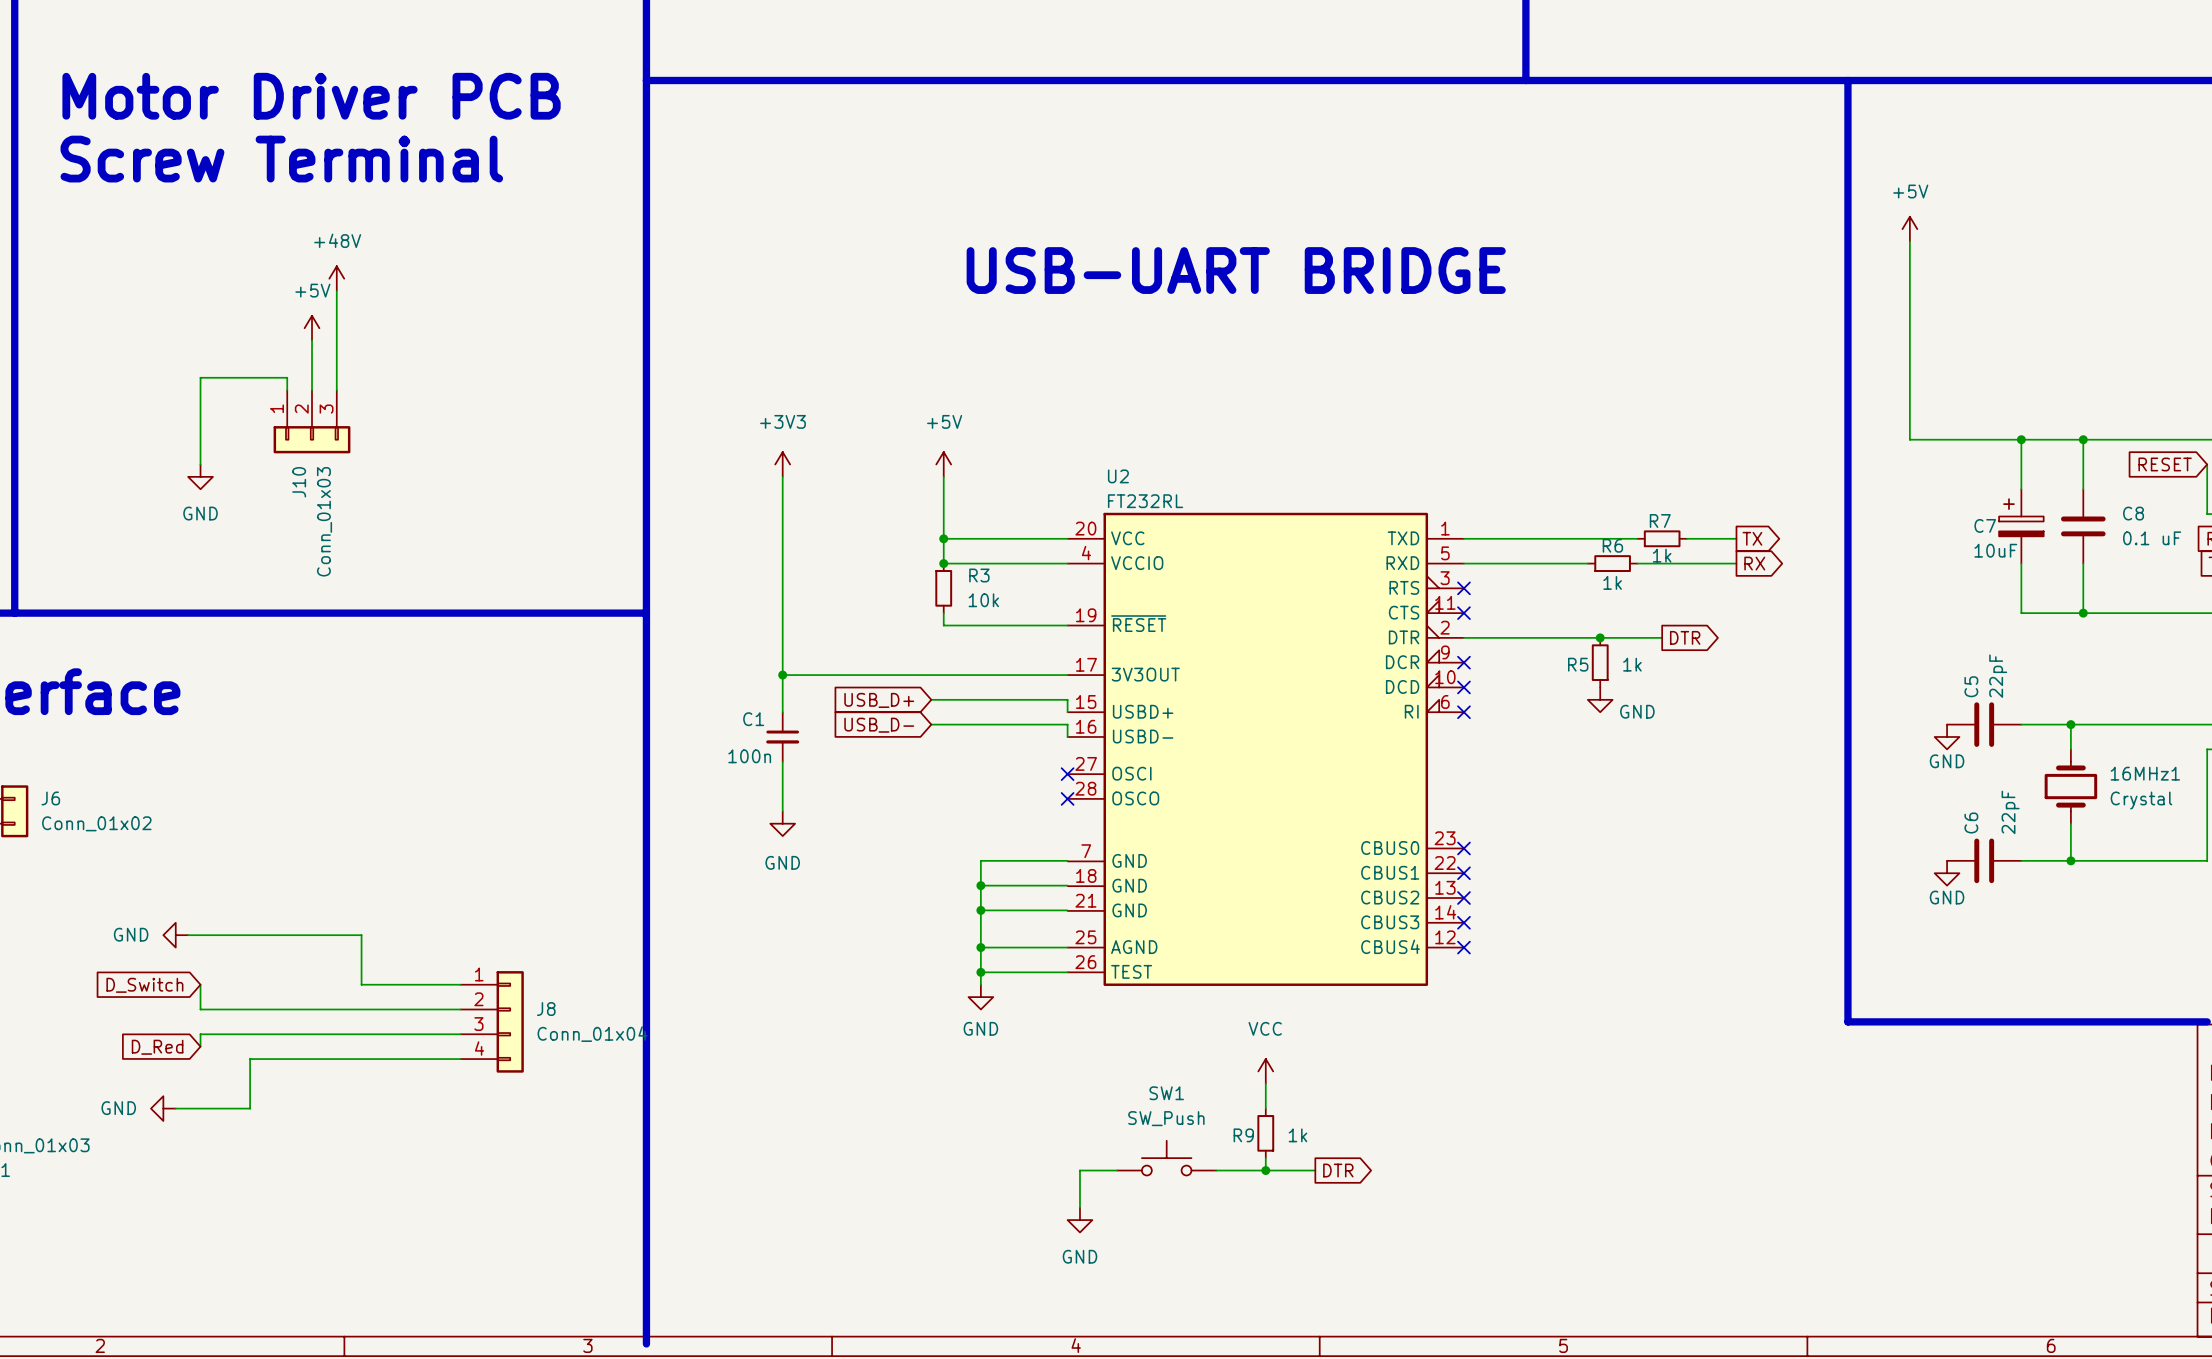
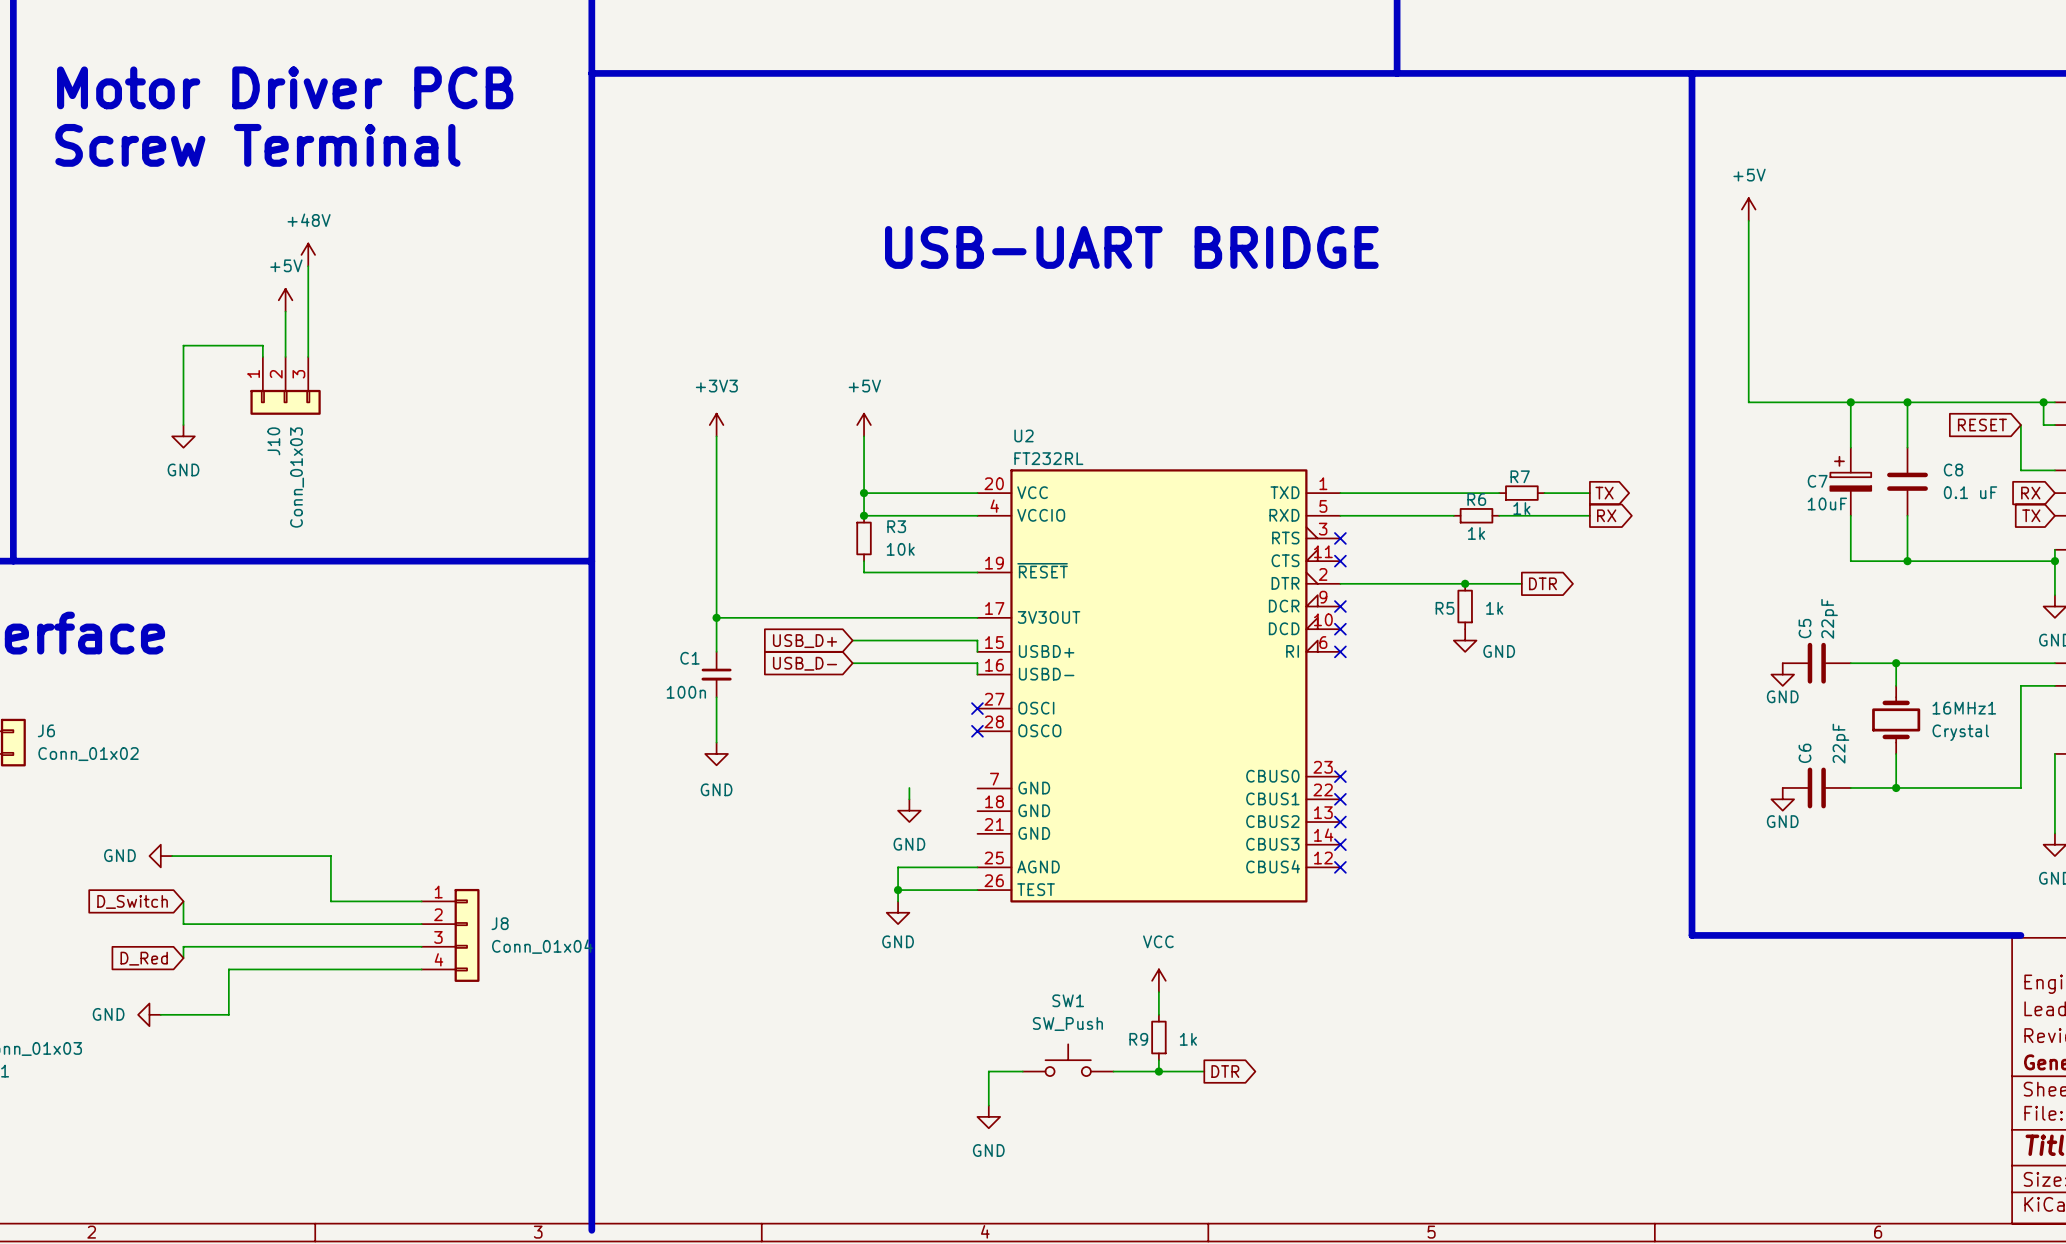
wire: none -> (909, 787) (909, 799)
wire: (1067, 860) (980, 860) (980, 947) -> none
wire: (980, 885) (1067, 885) -> none
junction: (980, 885) -> none
power symbol: none -> GND (909, 810)
wire: (980, 910) (1067, 910) -> none
junction: (980, 910) -> none
junction: (980, 947) -> none

